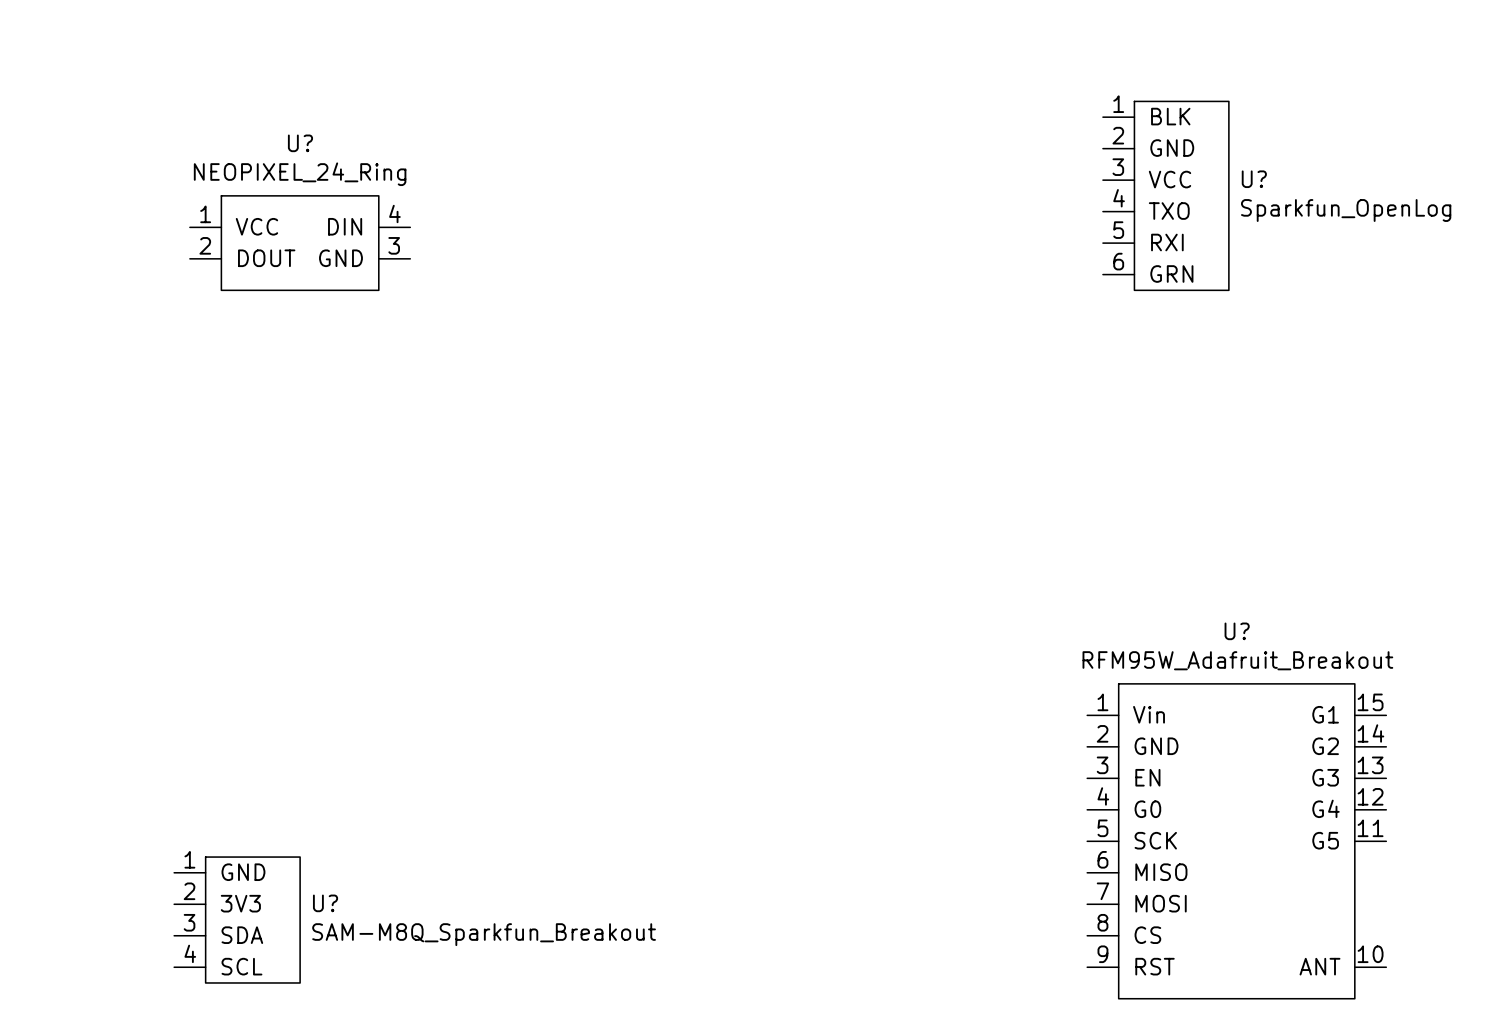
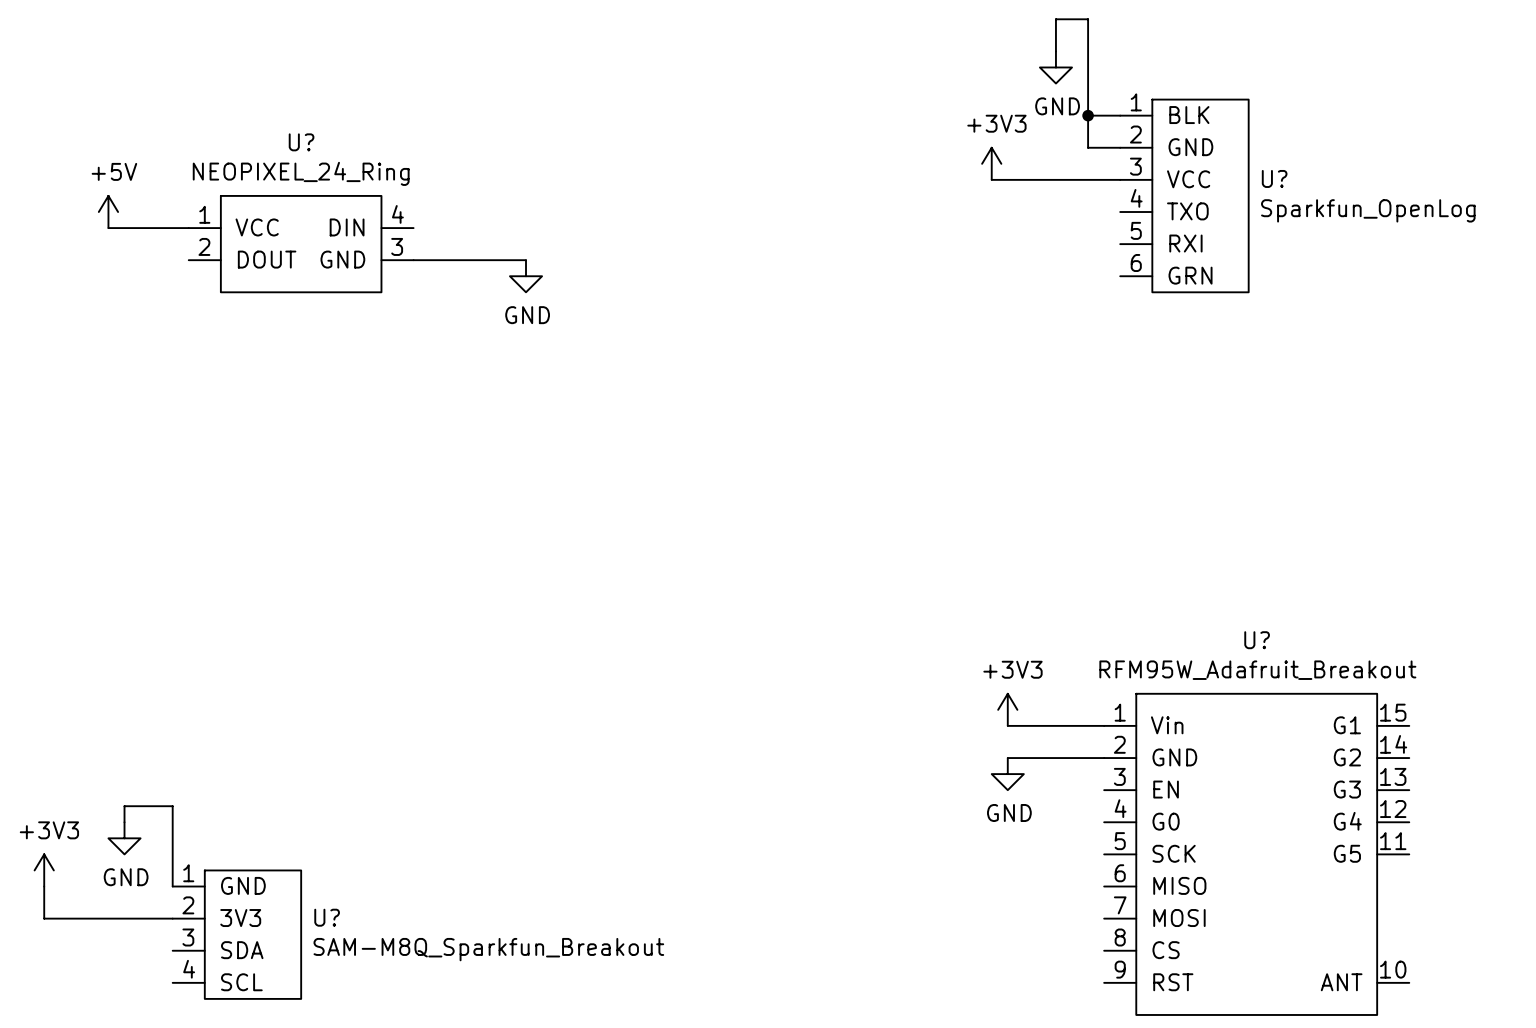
wire: none -> (1055, 51) (1055, 19) (1088, 19) (1088, 147) (1120, 147)
power symbol: none -> GND (1055, 67)
wire: none -> (1088, 115) (1120, 115)
junction: none -> (1088, 115)
power symbol: none -> +3V3 (991, 163)
wire: none -> (991, 179) (1120, 179)
power symbol: none -> +5V (108, 212)
wire: none -> (108, 228) (188, 228)
wire: none -> (413, 260) (526, 260)
power symbol: none -> GND (526, 276)
power symbol: none -> +3V3 (1007, 709)
wire: none -> (1007, 725) (1104, 725)
wire: none -> (1007, 758) (1104, 758)
power symbol: none -> GND (1007, 774)
wire: none -> (124, 822) (124, 806) (172, 806) (172, 886)
power symbol: none -> GND (124, 838)
power symbol: none -> +3V3 (44, 870)
wire: none -> (44, 886) (44, 918) (172, 918)

